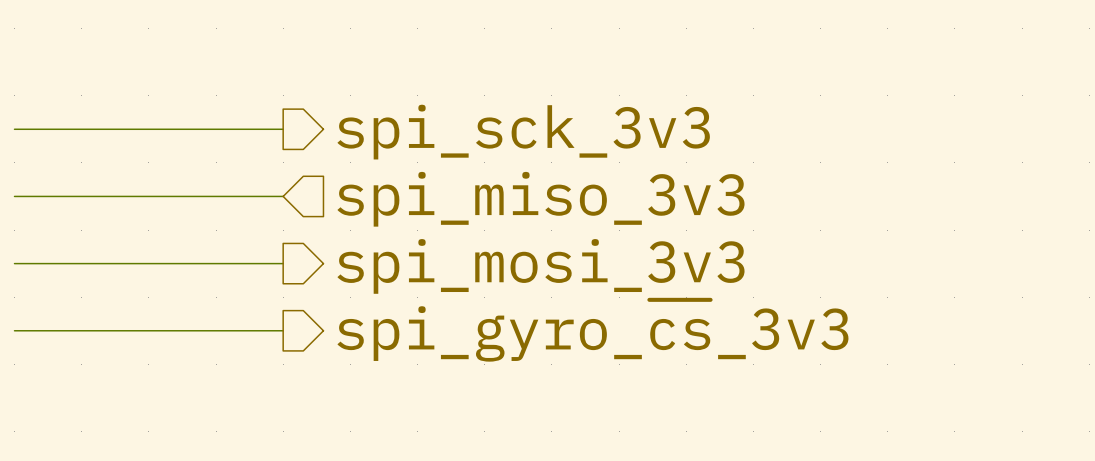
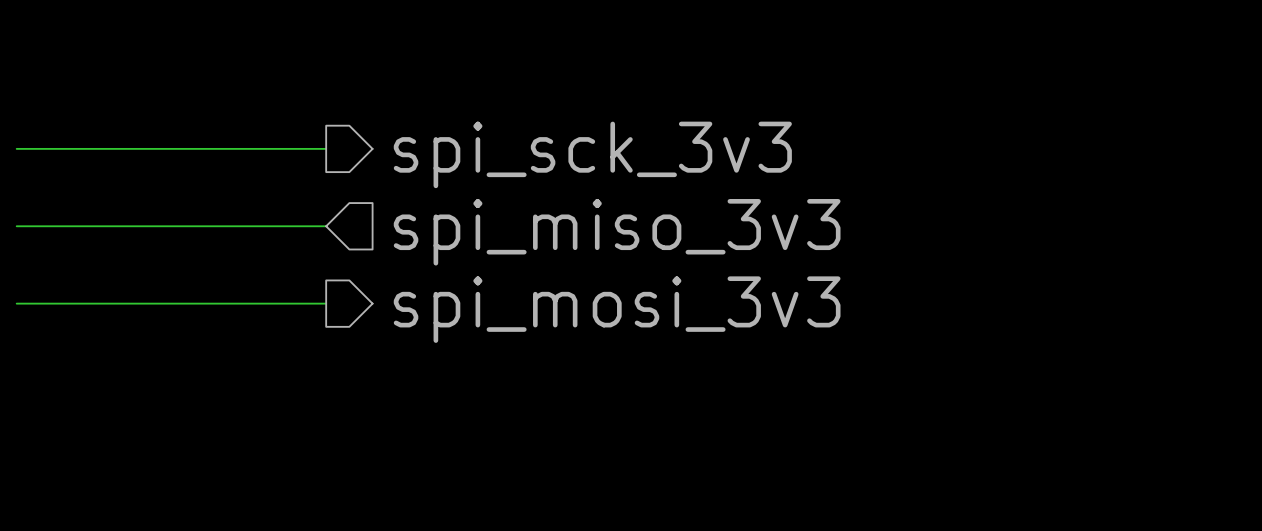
wire: (14, 330) (283, 330) -> none
hierarchical label: spi_gyro_~{cs}_3v3 (592, 330) -> none

